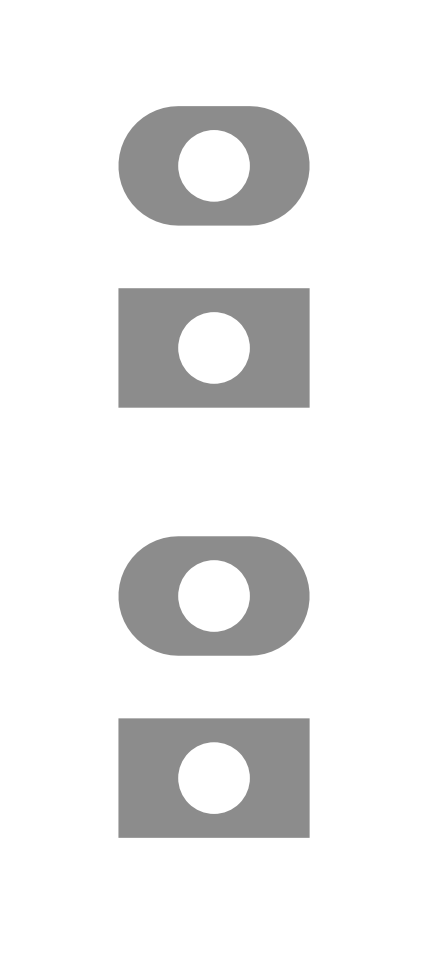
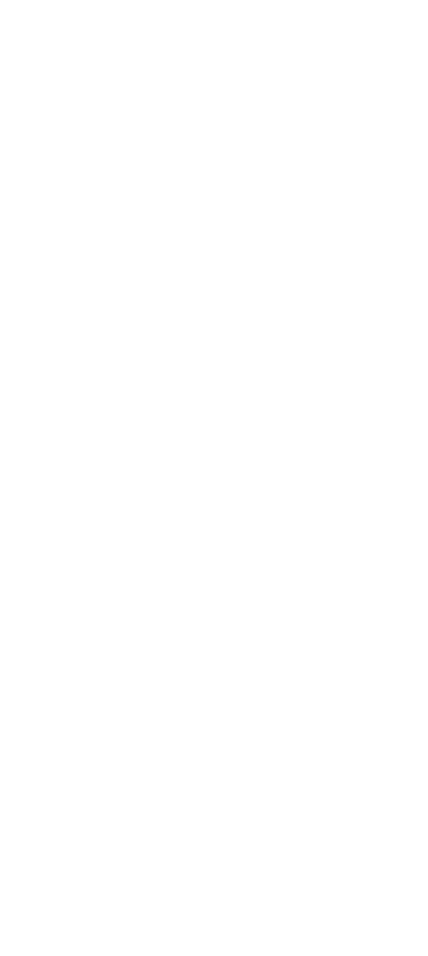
part: (214, 256) -> none
part: (214, 687) -> none

